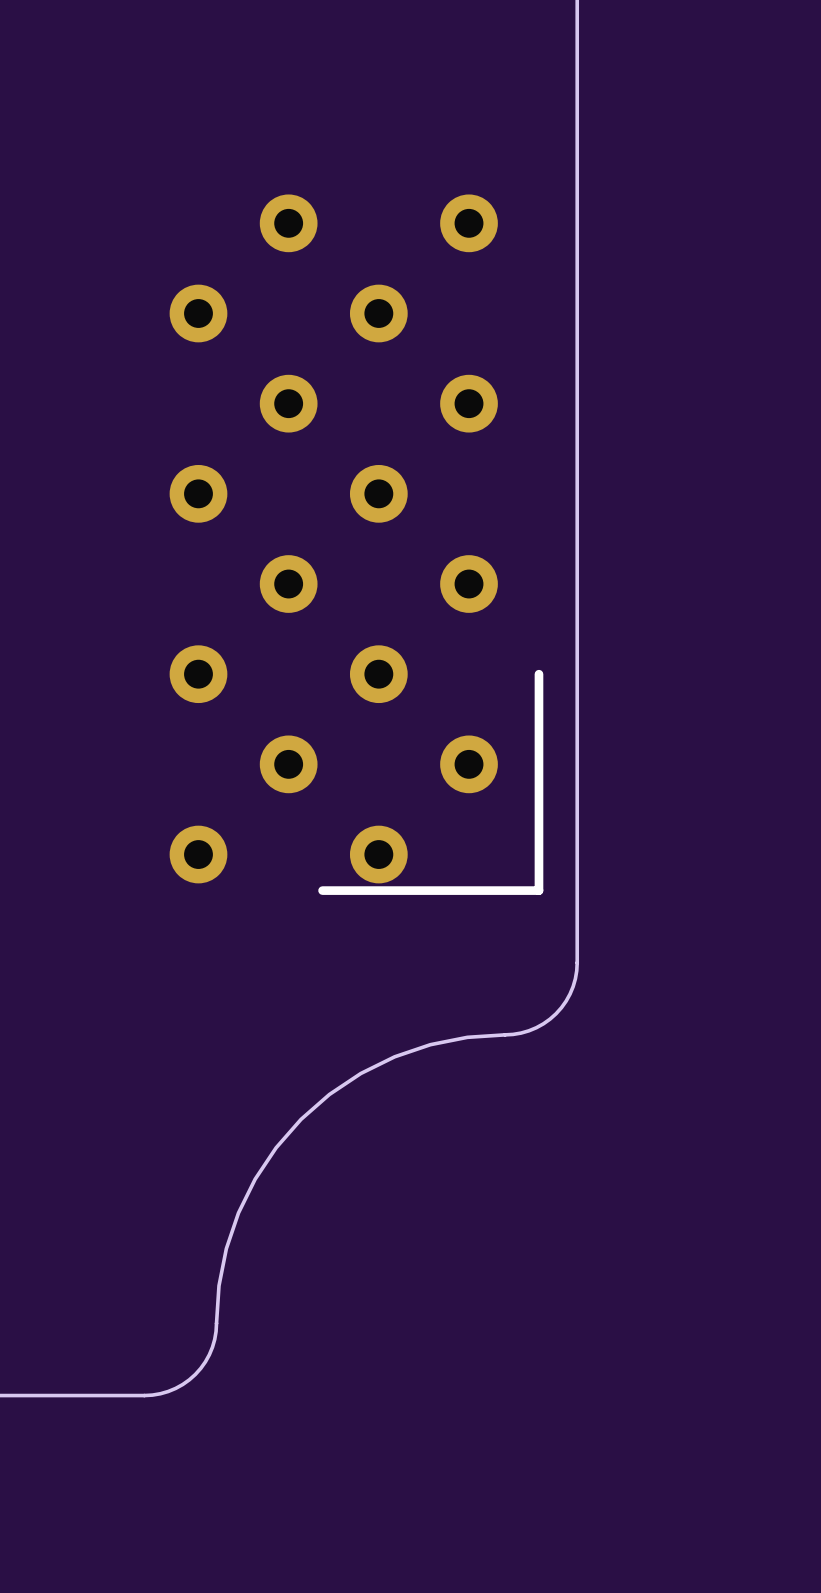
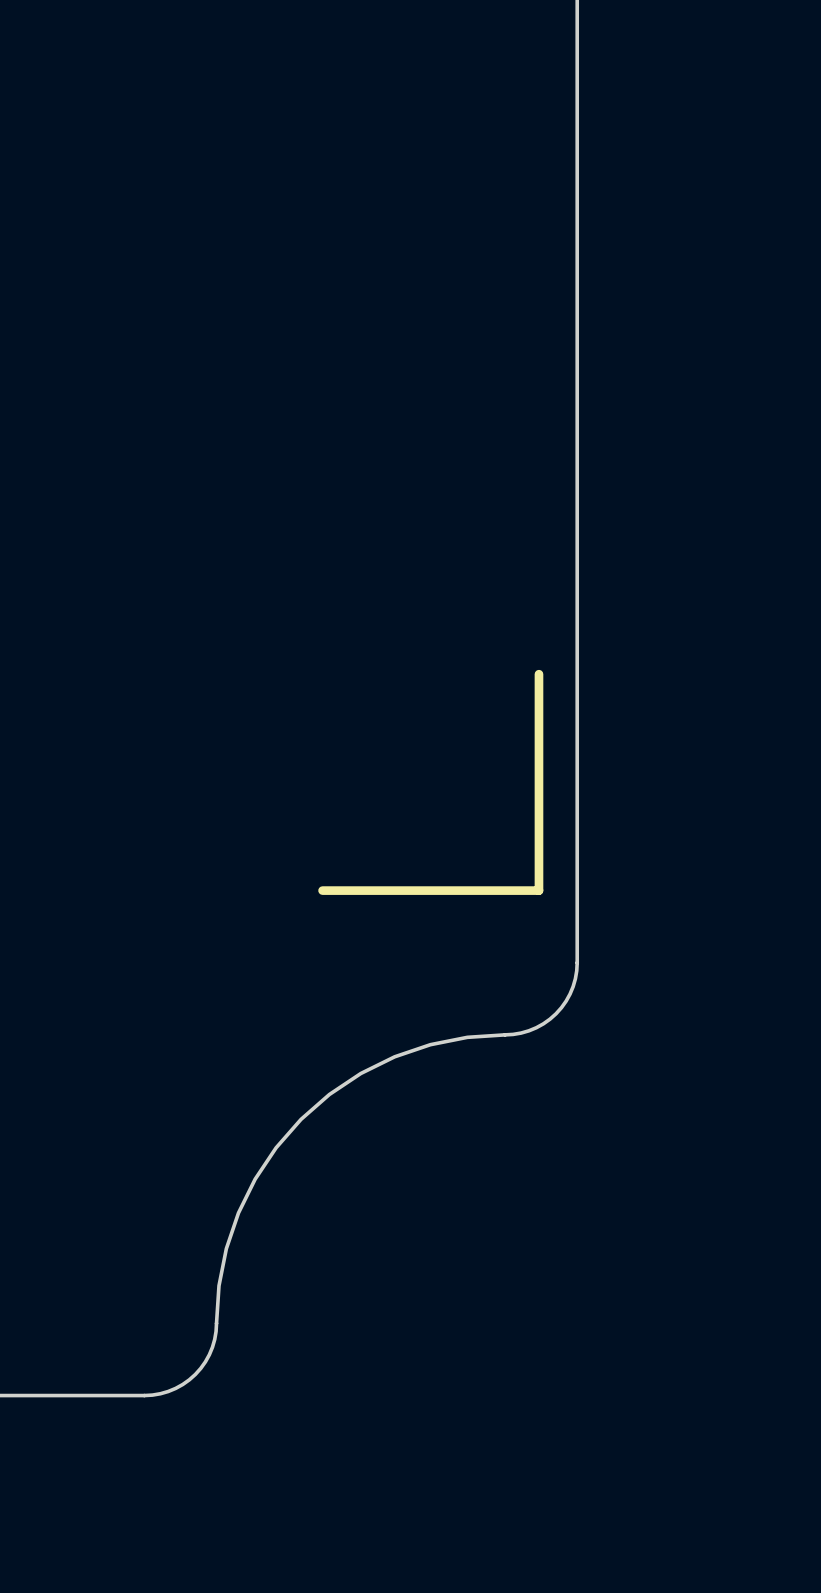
via: (288, 223) -> none
via: (469, 223) -> none
via: (198, 313) -> none
via: (378, 313) -> none
via: (288, 403) -> none
via: (469, 403) -> none
via: (198, 493) -> none
via: (378, 493) -> none
via: (288, 584) -> none
via: (469, 584) -> none
via: (198, 674) -> none
via: (378, 674) -> none
via: (288, 764) -> none
via: (469, 764) -> none
via: (198, 854) -> none
via: (378, 854) -> none

